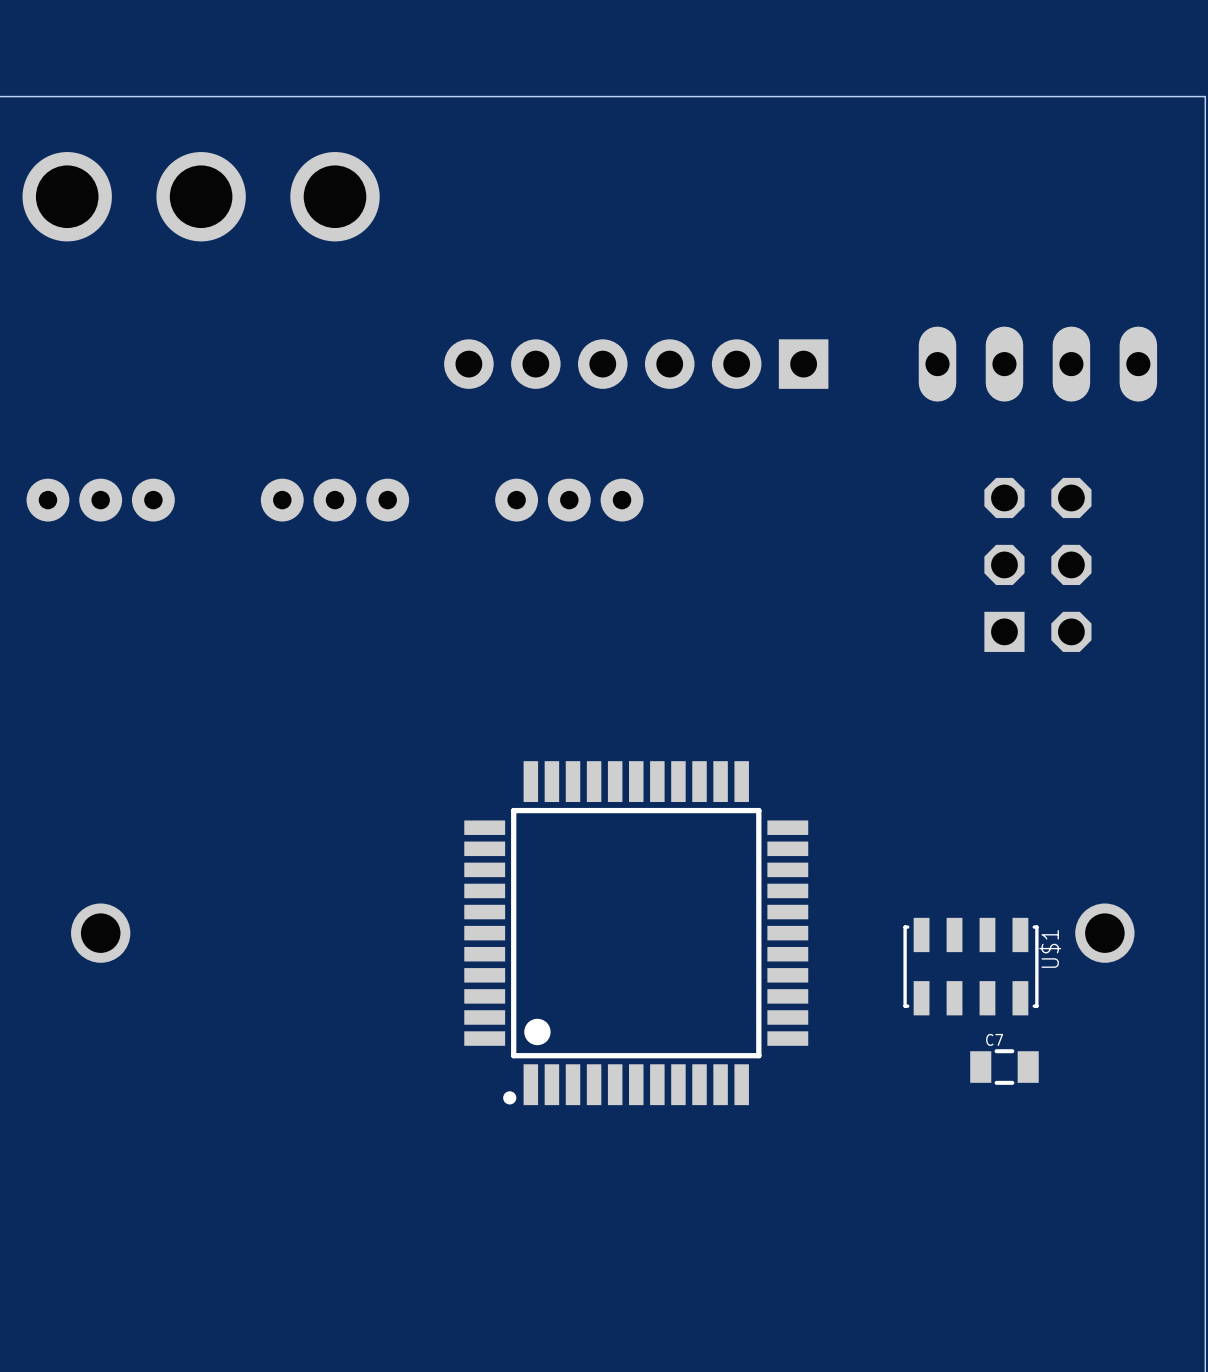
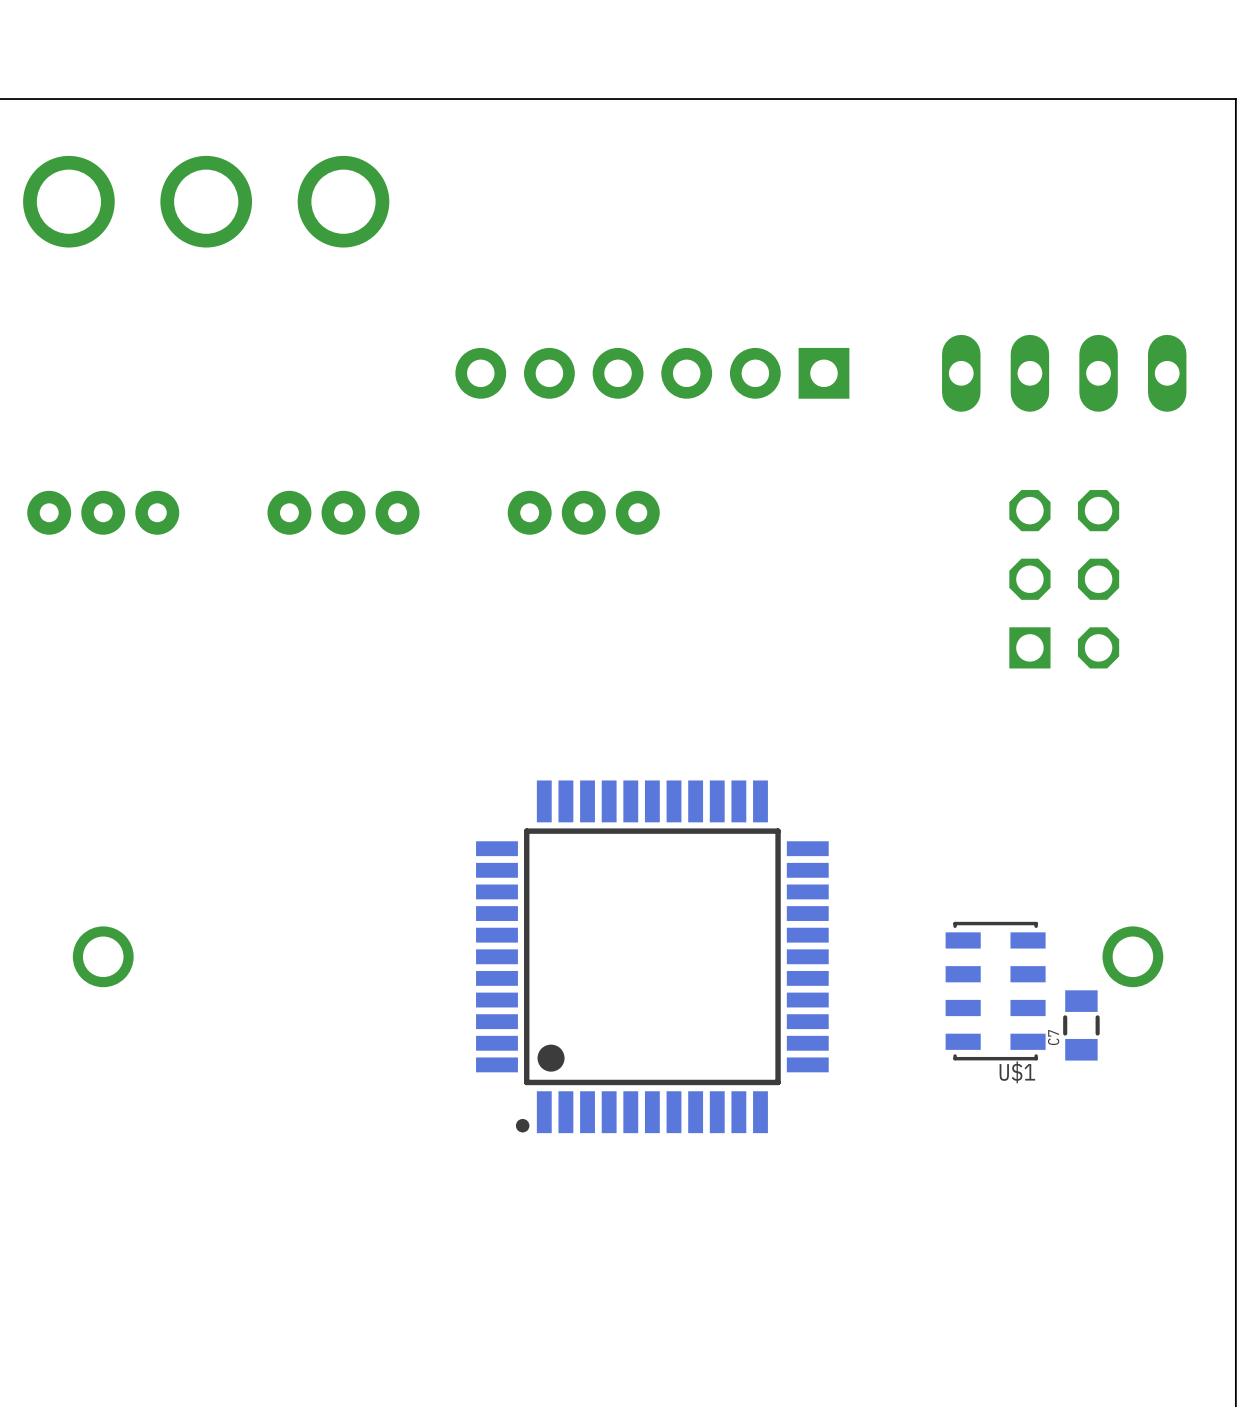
U$1 rotation: 0° (970, 966) -> 90° clockwise (995, 991)
C7 rotation: 0° (1004, 1067) -> 90° clockwise (1081, 1025)
C7 position: (1004, 1067) -> (1081, 1025)

